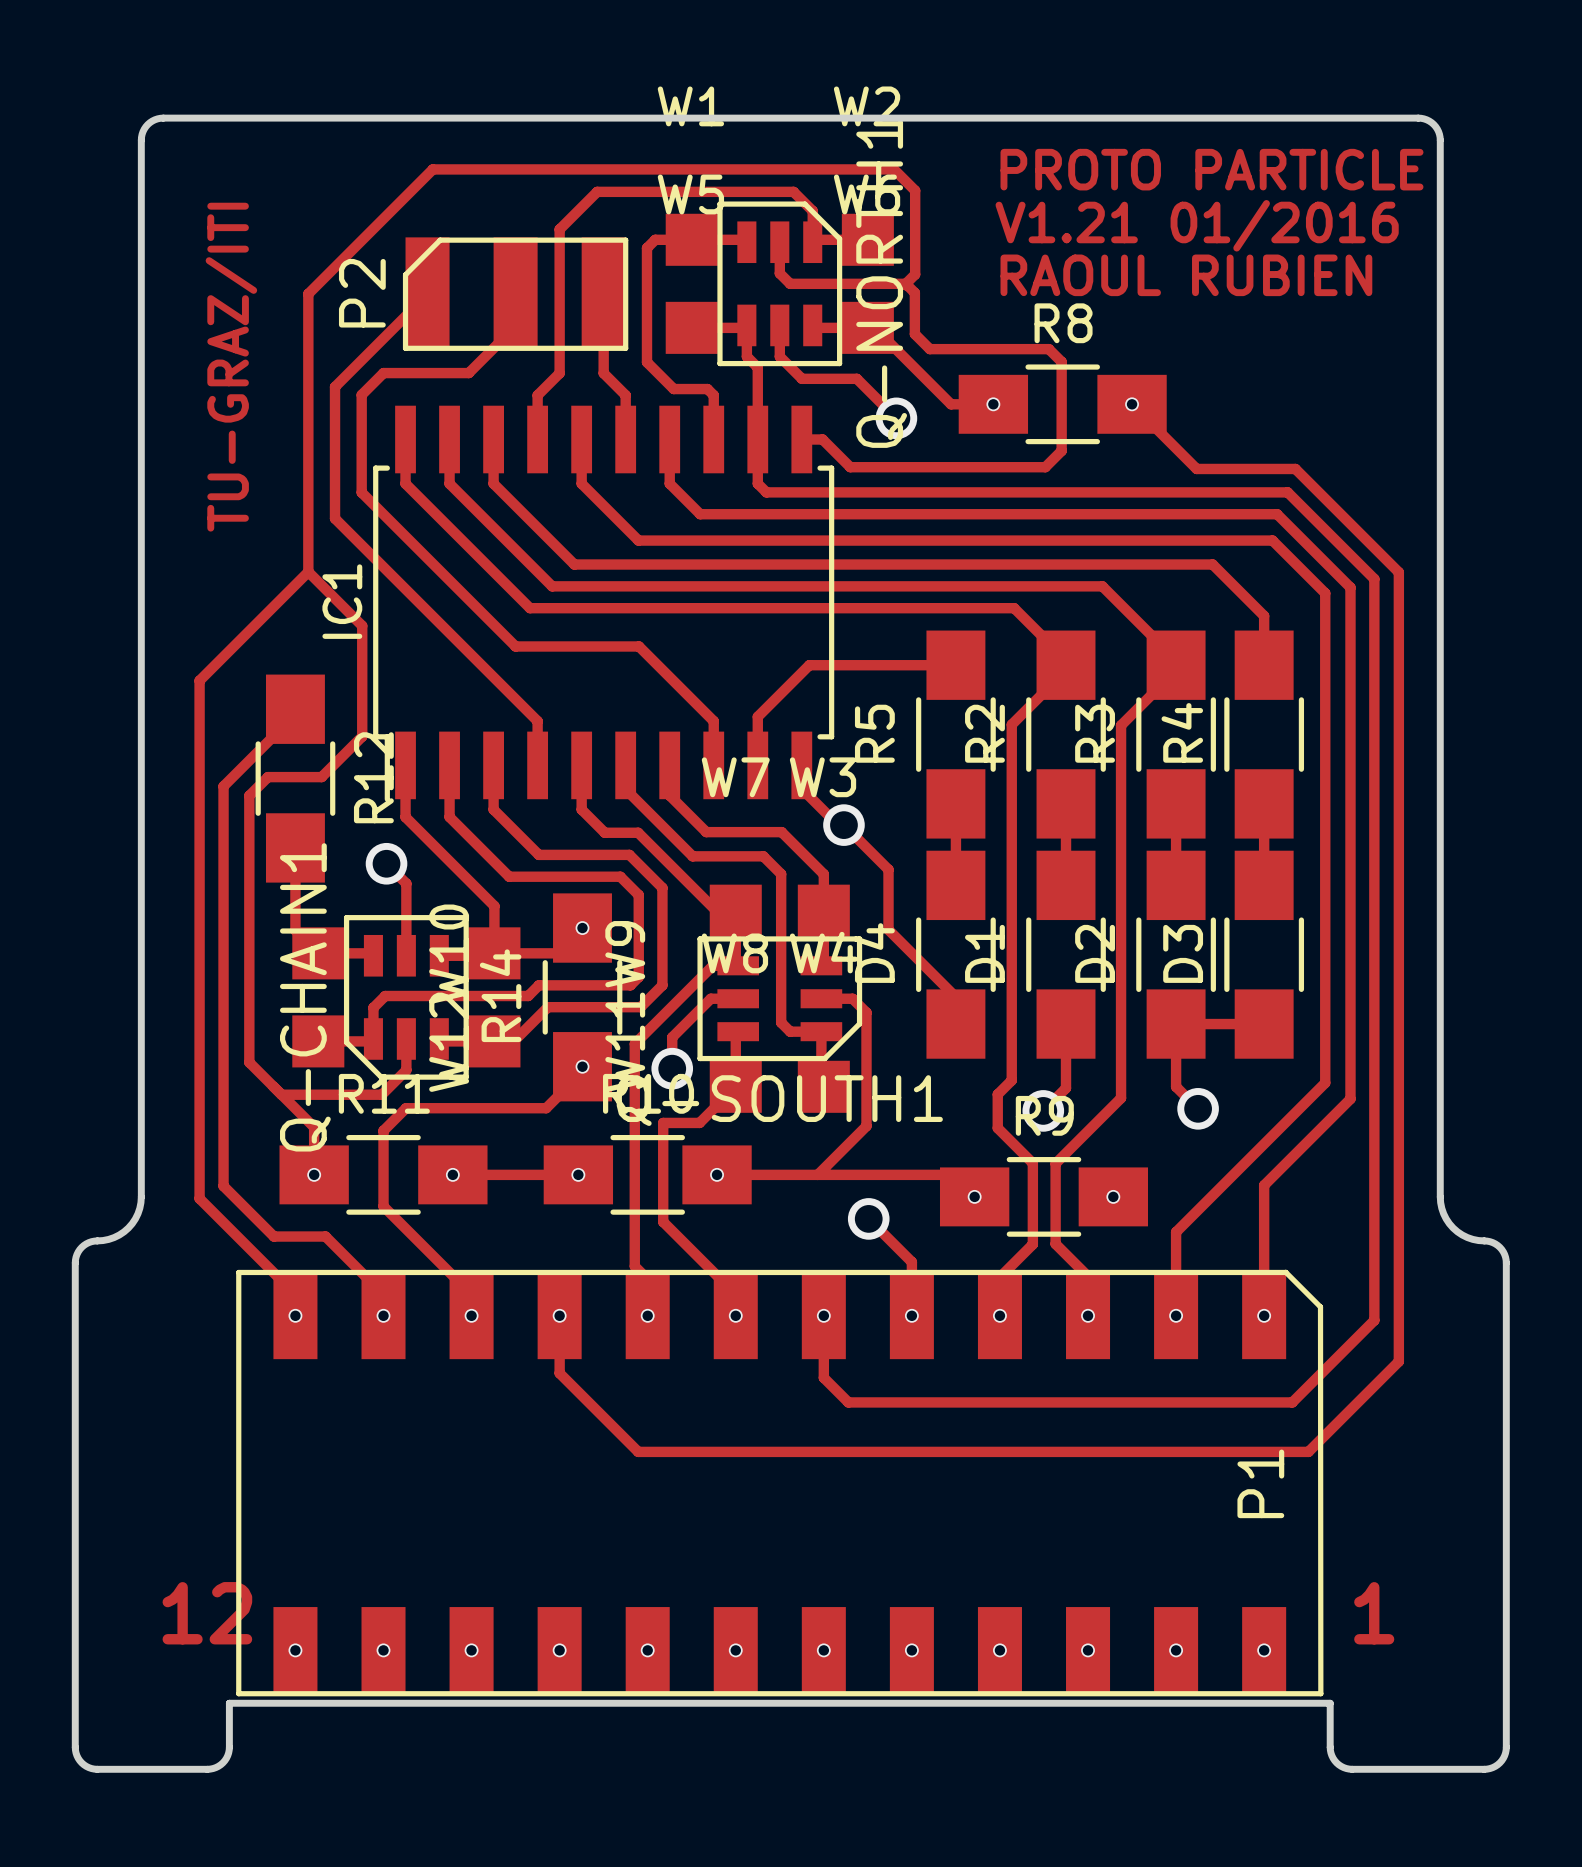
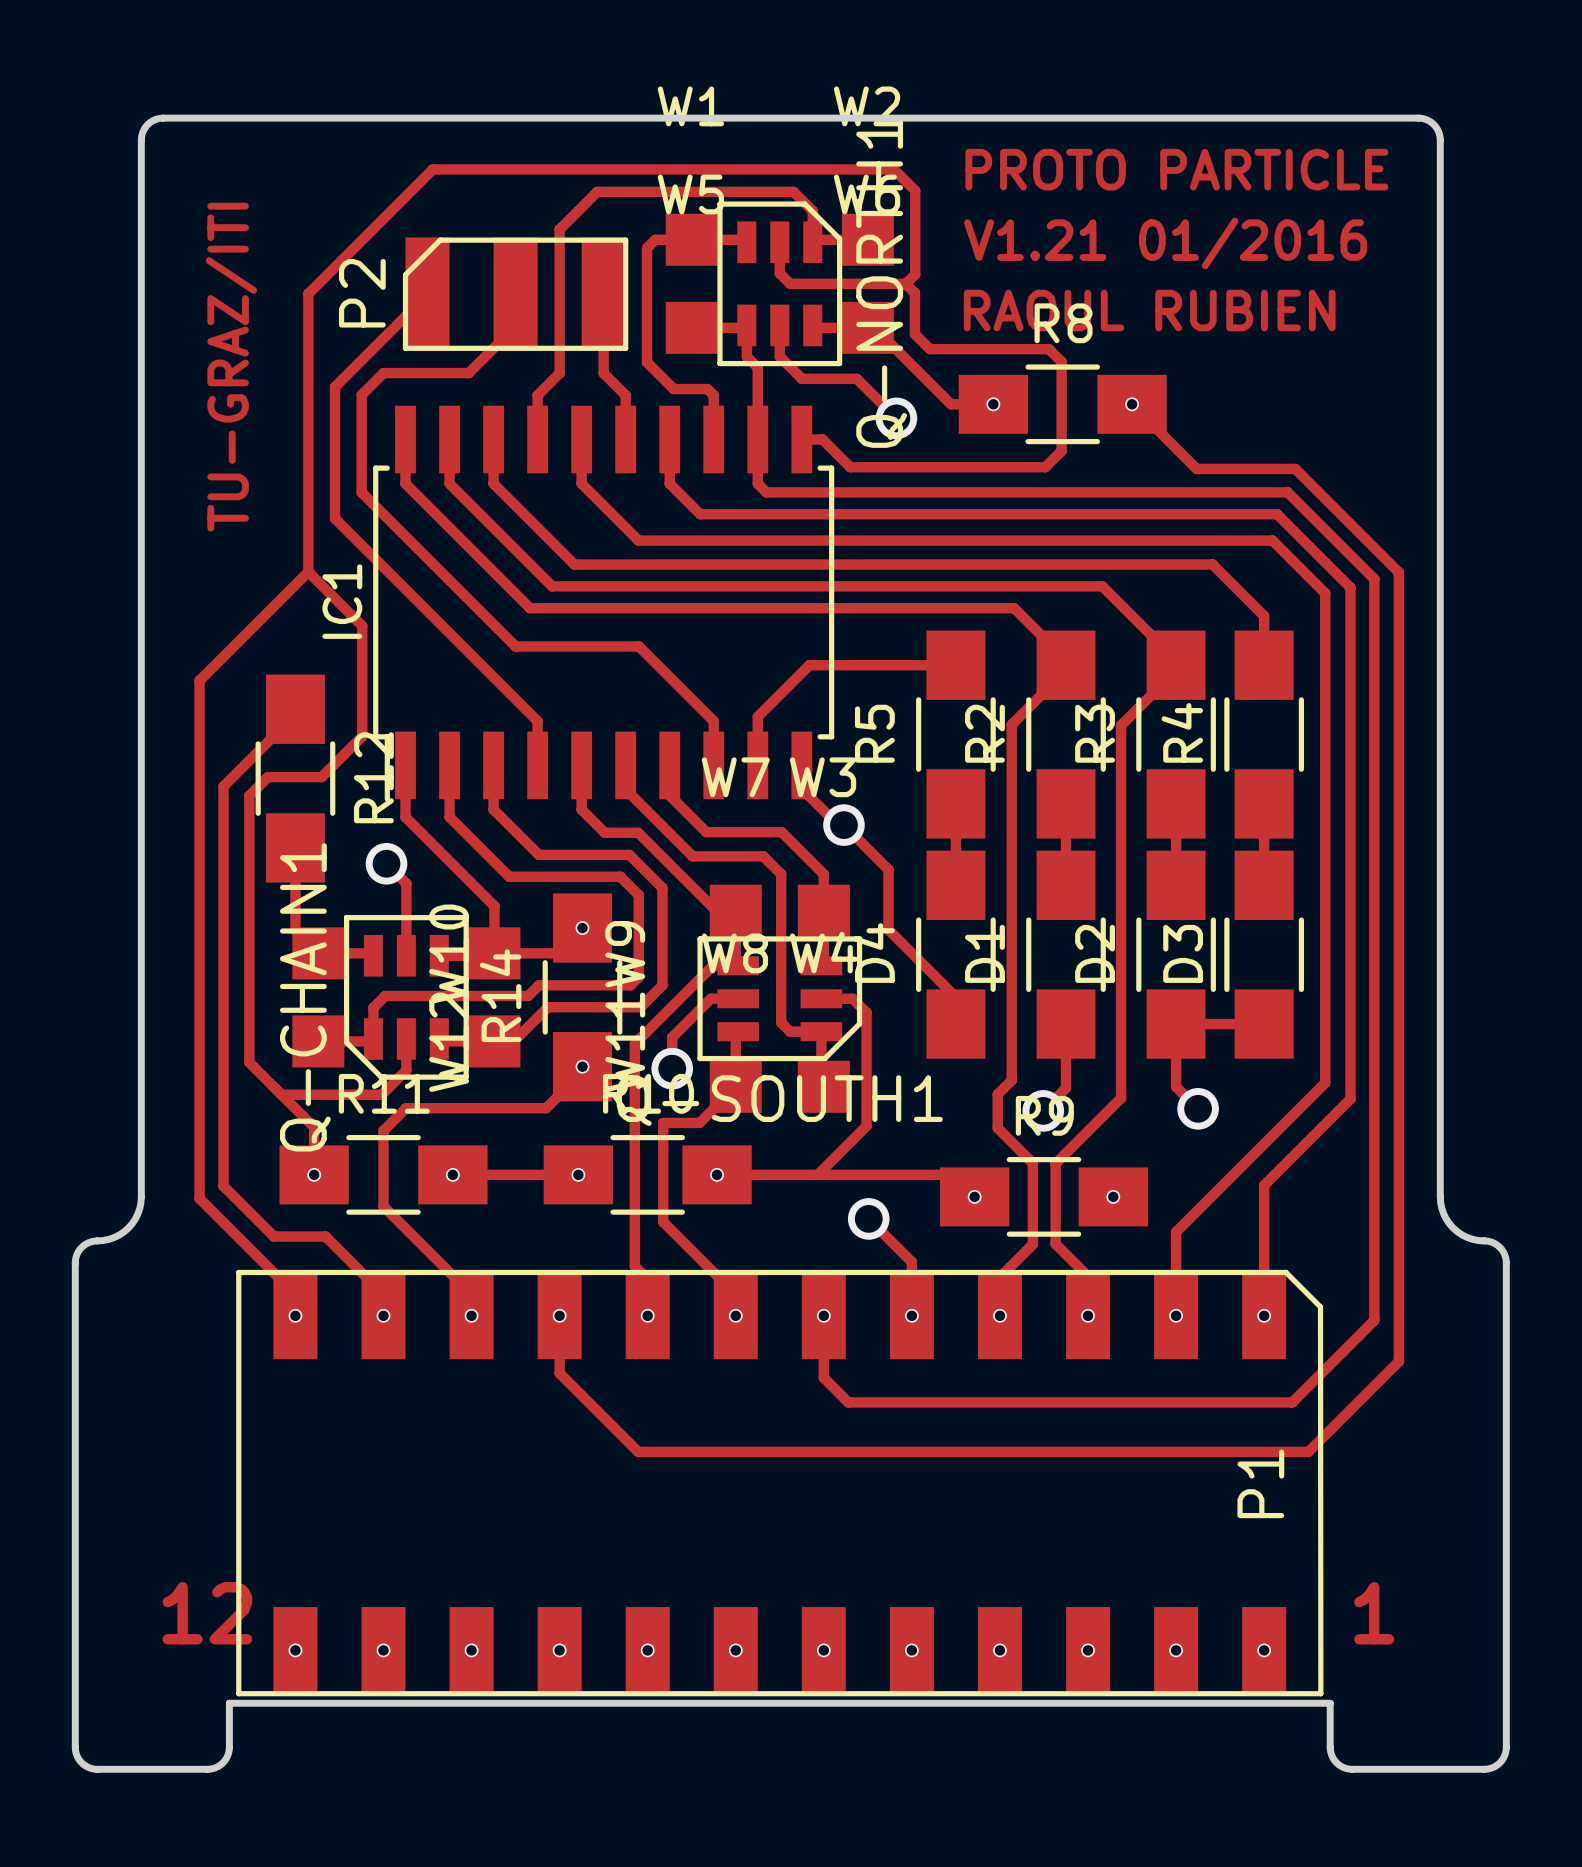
text position: PROTO PARTICLE (1211, 169) -> PROTO PARTICLE (1176, 169)
text position: V1.21 01/2016 (1197, 225) -> V1.21 01/2016 (1165, 243)
text position: RAOUL RUBIEN (1186, 275) -> RAOUL RUBIEN (1149, 310)

